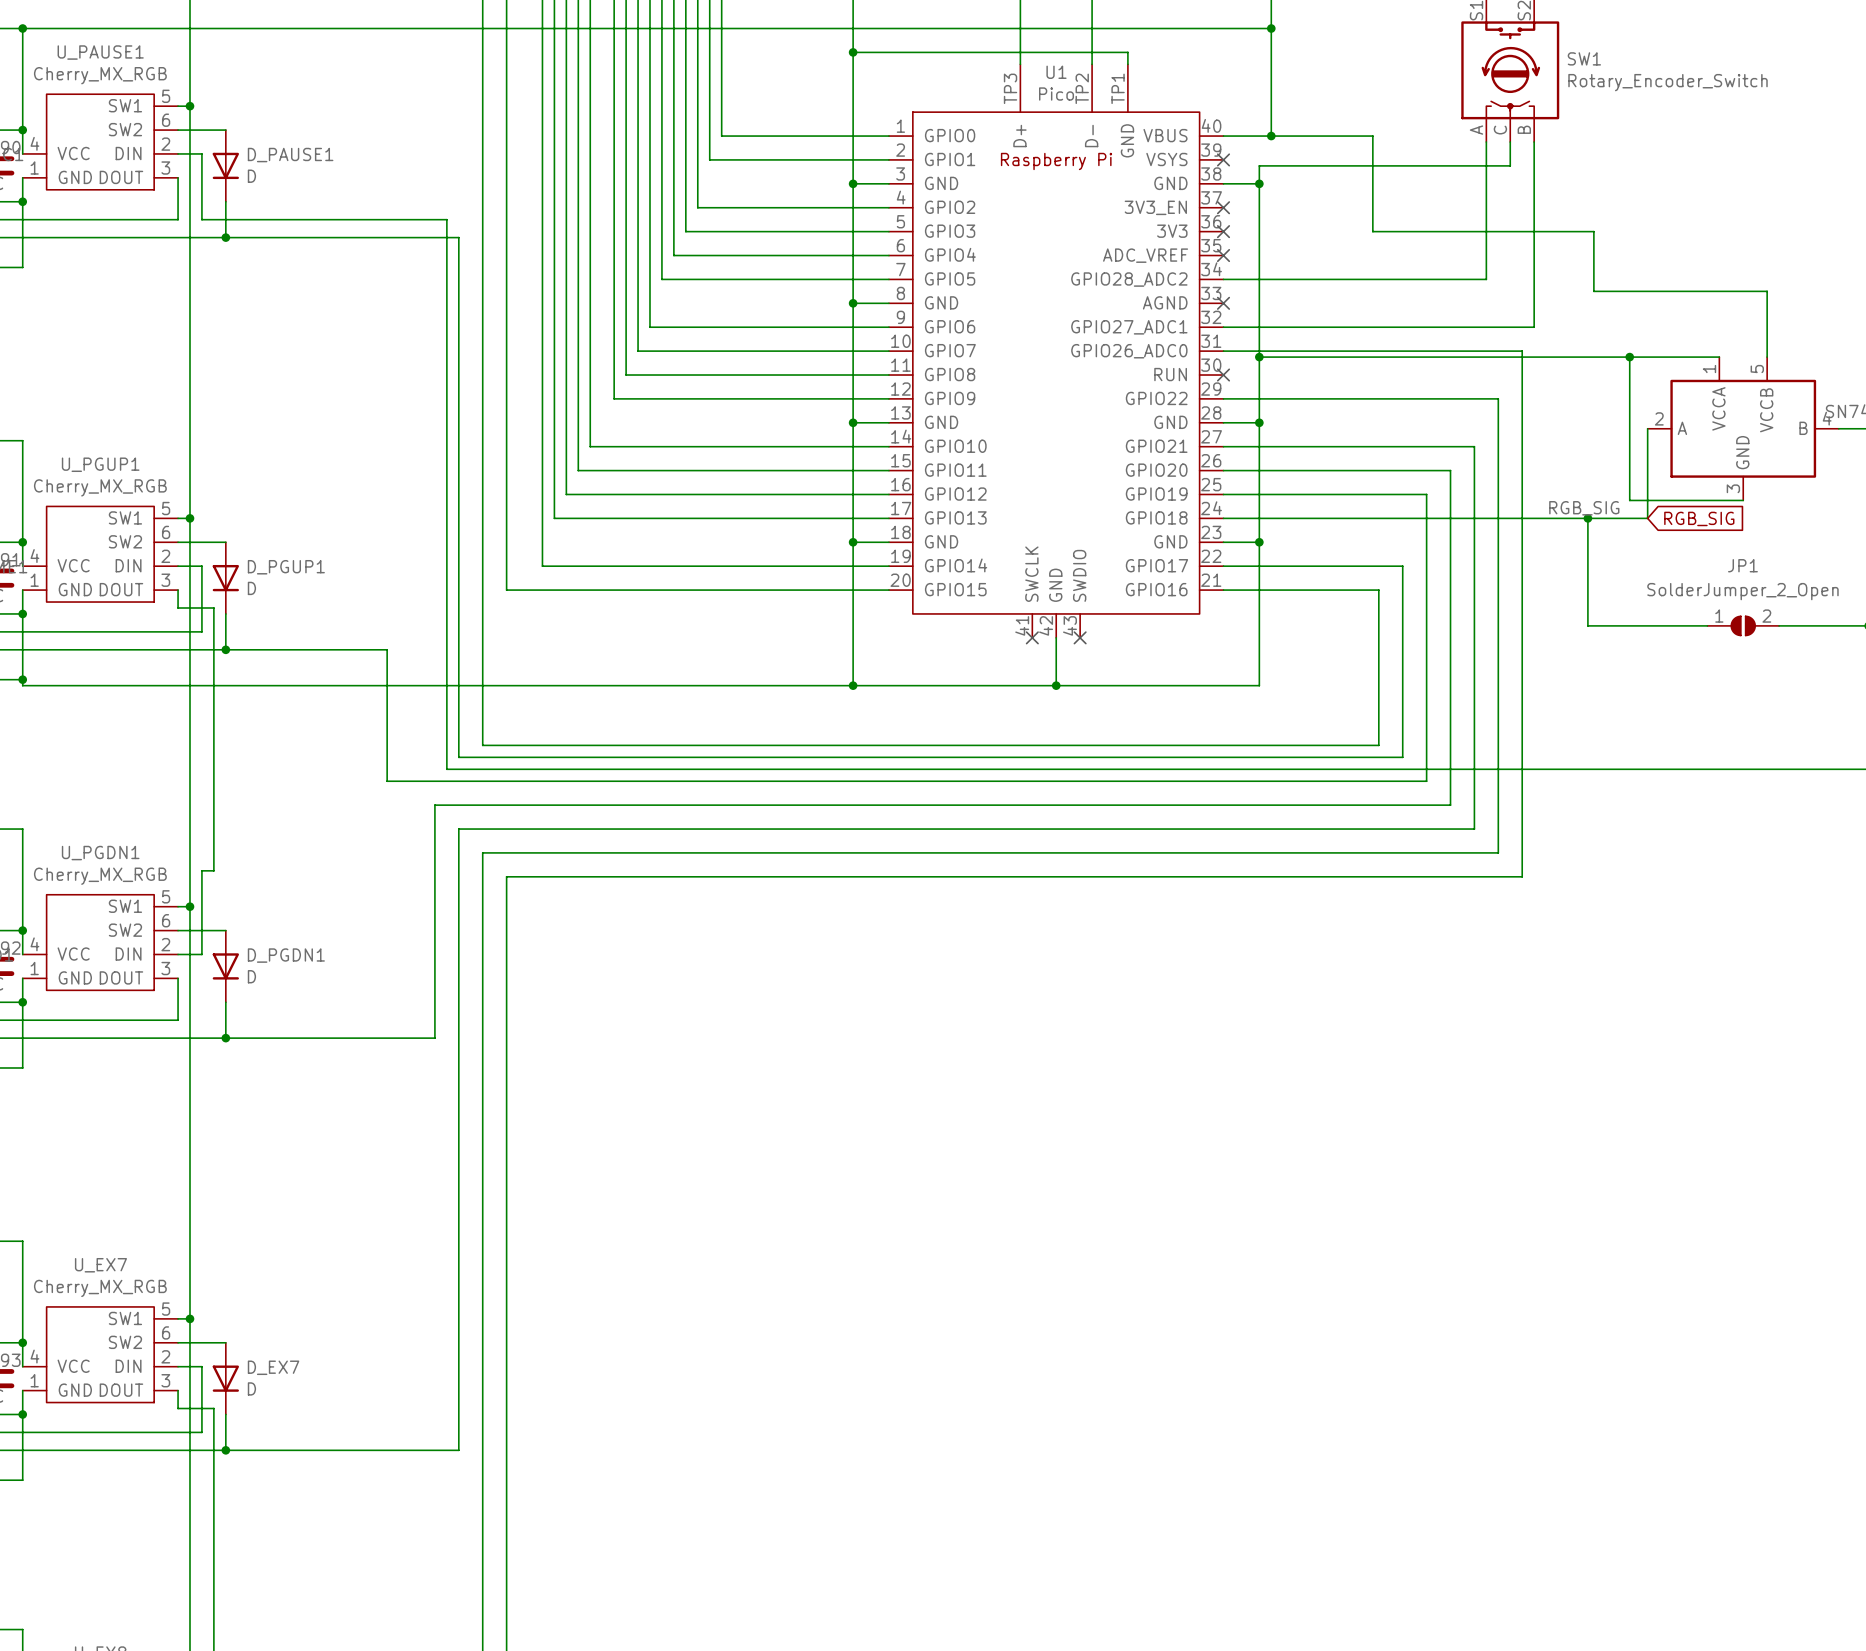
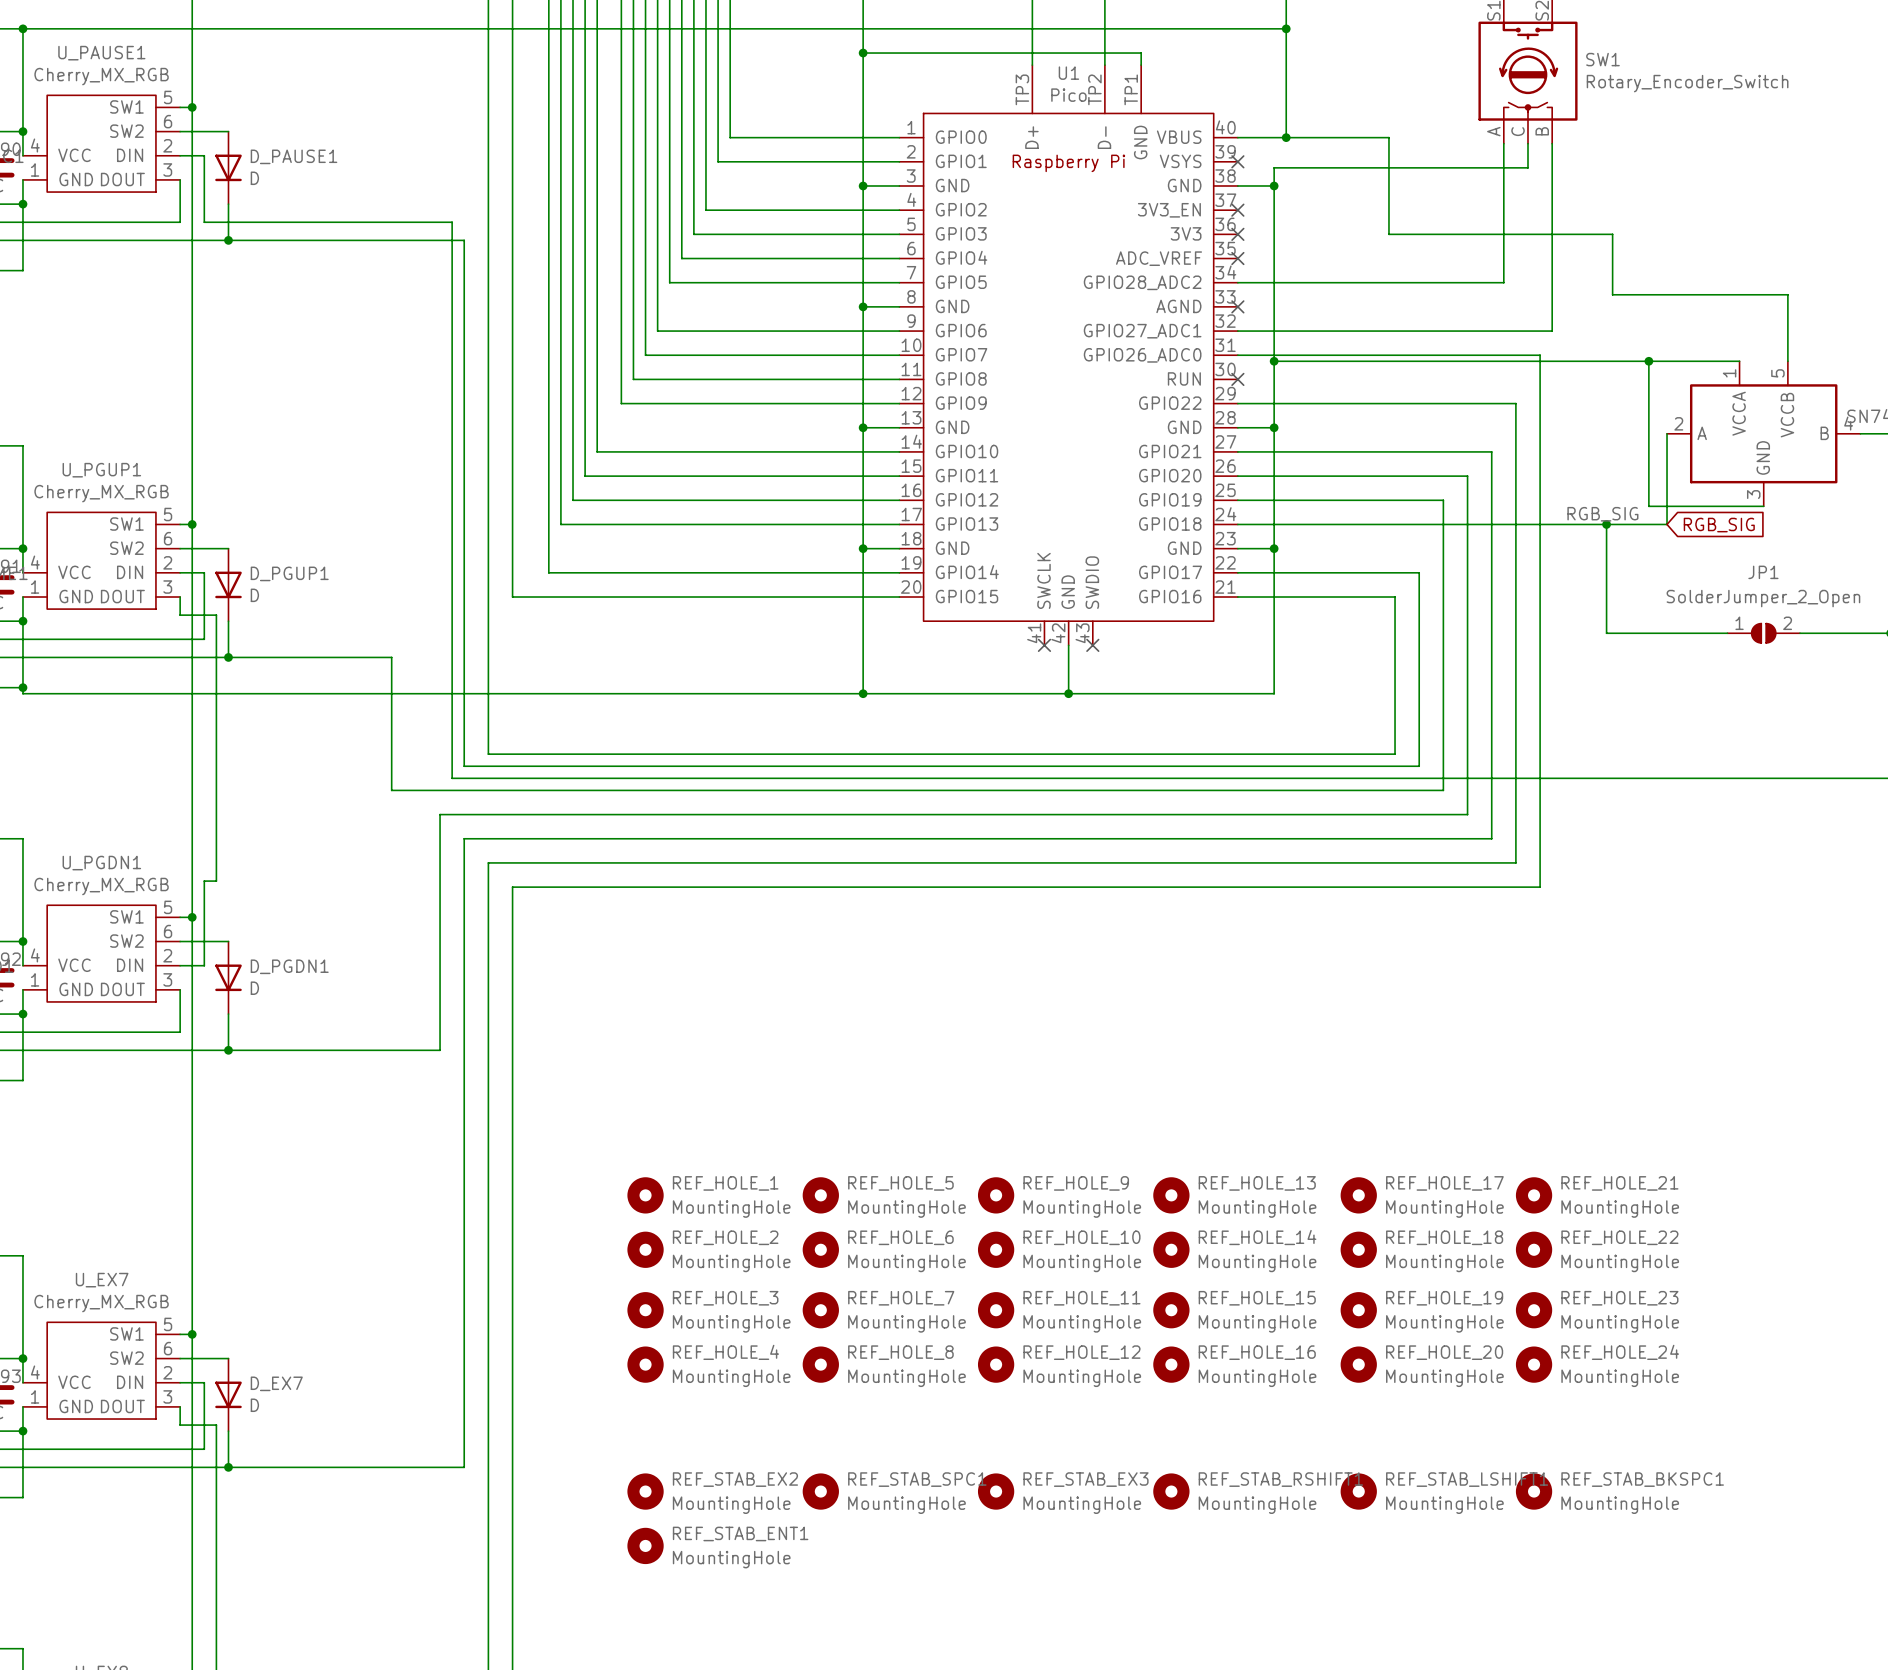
REF_HOLE_1: none -> MountingHole (645, 1195)
REF_HOLE_5: none -> MountingHole (820, 1195)
REF_HOLE_9: none -> MountingHole (996, 1195)
REF_HOLE_13: none -> MountingHole (1171, 1195)
REF_HOLE_17: none -> MountingHole (1358, 1195)
REF_HOLE_21: none -> MountingHole (1534, 1195)
REF_HOLE_2: none -> MountingHole (645, 1249)
REF_HOLE_6: none -> MountingHole (820, 1249)
REF_HOLE_10: none -> MountingHole (996, 1249)
REF_HOLE_14: none -> MountingHole (1171, 1249)
REF_HOLE_18: none -> MountingHole (1358, 1249)
REF_HOLE_22: none -> MountingHole (1534, 1249)
REF_HOLE_3: none -> MountingHole (645, 1310)
REF_HOLE_7: none -> MountingHole (820, 1310)
REF_HOLE_11: none -> MountingHole (996, 1310)
REF_HOLE_15: none -> MountingHole (1171, 1310)
REF_HOLE_19: none -> MountingHole (1358, 1310)
REF_HOLE_23: none -> MountingHole (1534, 1310)
REF_HOLE_4: none -> MountingHole (645, 1364)
REF_HOLE_8: none -> MountingHole (820, 1364)
REF_HOLE_12: none -> MountingHole (996, 1364)
REF_HOLE_16: none -> MountingHole (1171, 1364)
REF_HOLE_20: none -> MountingHole (1358, 1364)
REF_HOLE_24: none -> MountingHole (1534, 1364)
REF_STAB_EX2: none -> MountingHole (645, 1491)
REF_STAB_SPC1: none -> MountingHole (820, 1491)
REF_STAB_EX3: none -> MountingHole (996, 1491)
REF_STAB_RSHIFT1: none -> MountingHole (1171, 1491)
REF_STAB_LSHIFT1: none -> MountingHole (1358, 1491)
REF_STAB_BKSPC1: none -> MountingHole (1534, 1491)
REF_STAB_ENT1: none -> MountingHole (645, 1545)

